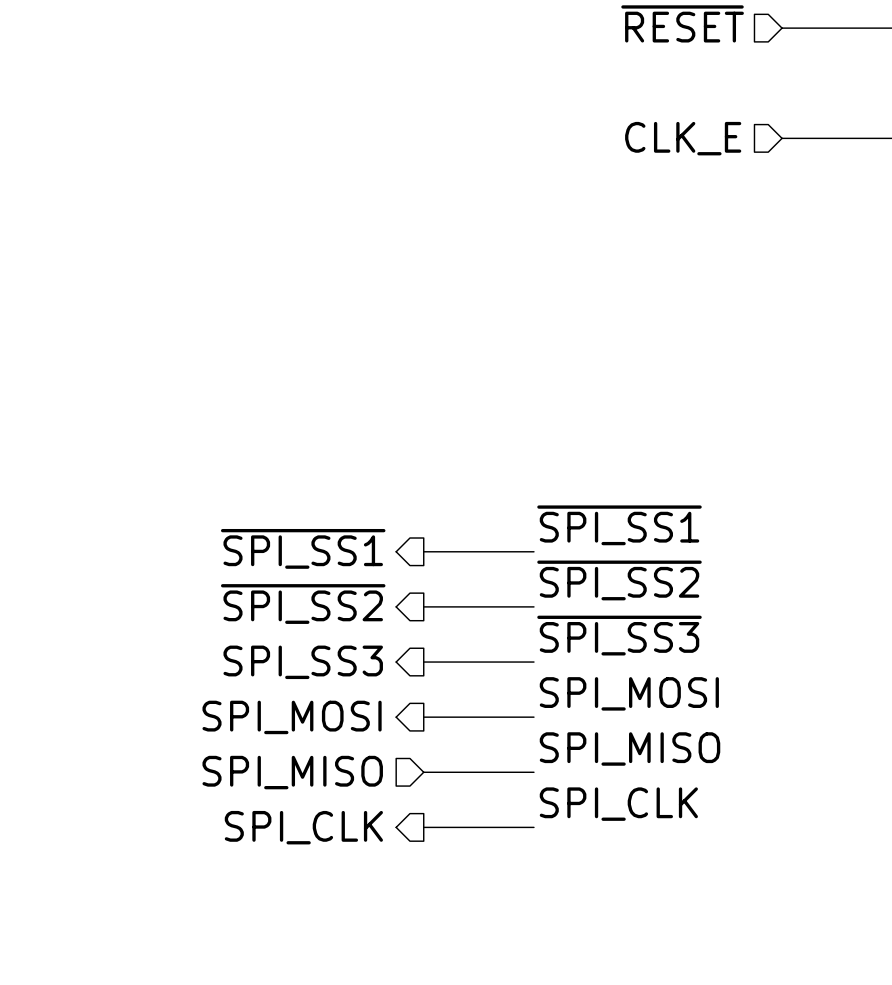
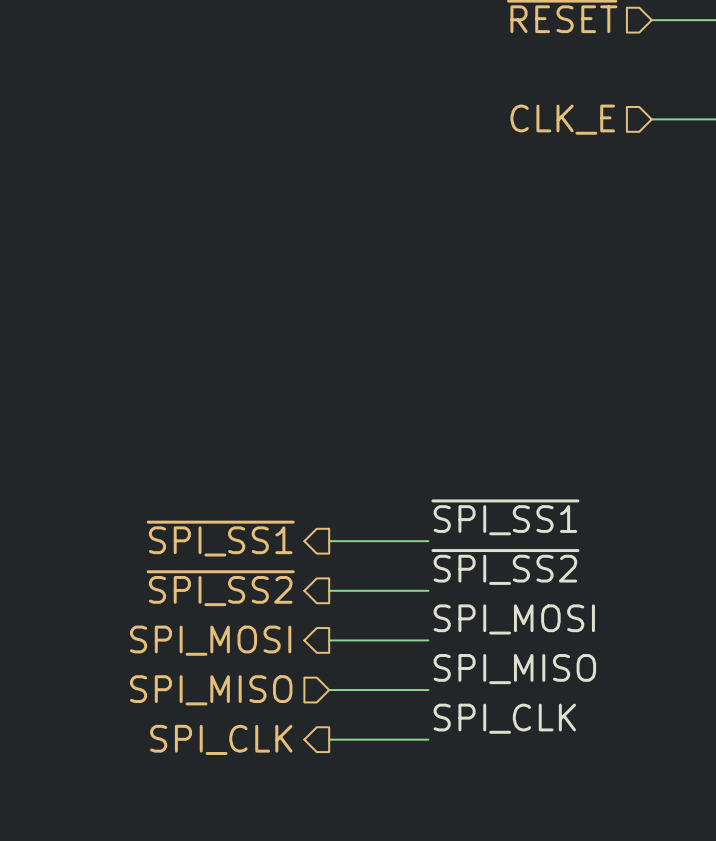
label: ~{SPI_SS1} (619, 525) -> none
hierarchical label: ~{SPI_SS1} (303, 548) -> none
wire: (423, 551) (533, 551) -> none
label: ~{SPI_SS2} (619, 580) -> ~{SPI_SS1} (505, 517)
hierarchical label: ~{SPI_SS2} (303, 604) -> ~{SPI_SS1} (220, 538)
label: ~{SPI_SS3} (619, 635) -> ~{SPI_SS2} (505, 566)
hierarchical label: SPI_SS3 (303, 662) -> ~{SPI_SS2} (220, 588)

